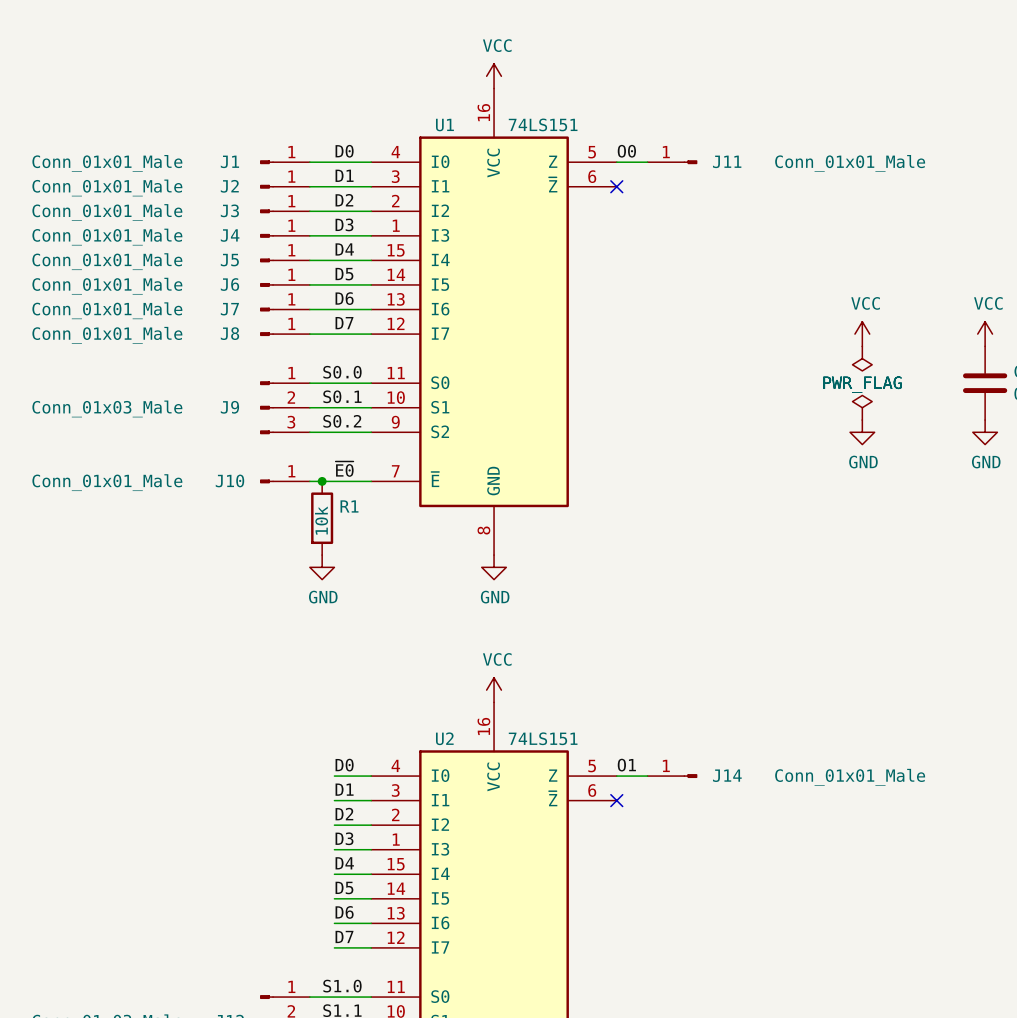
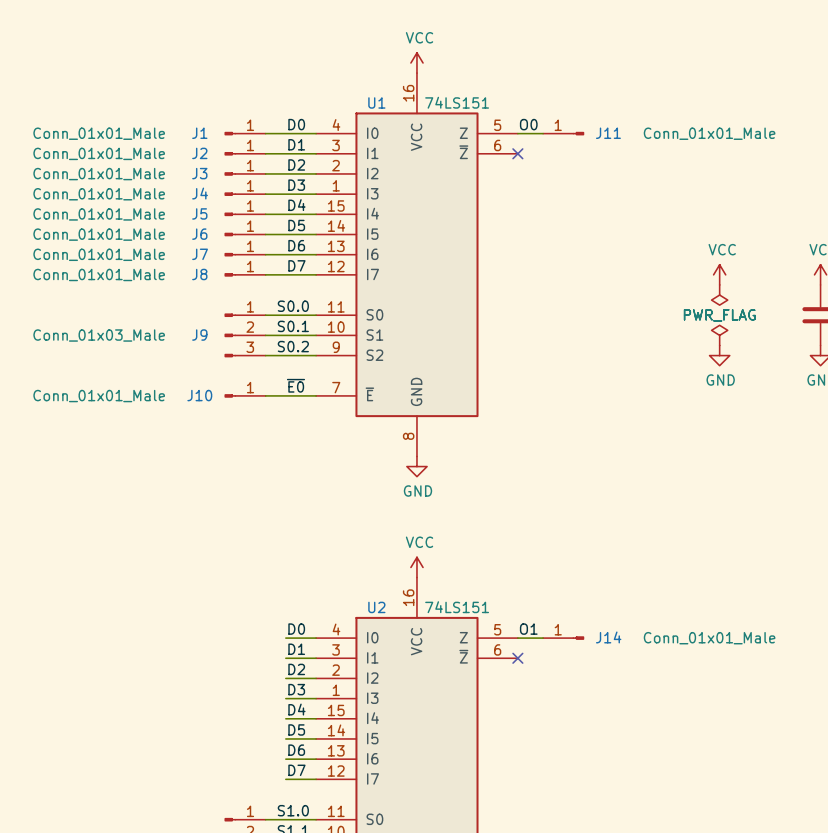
junction: (322, 481) -> none
R1: 10k (322, 518) -> none
power symbol: GND (322, 567) -> none

